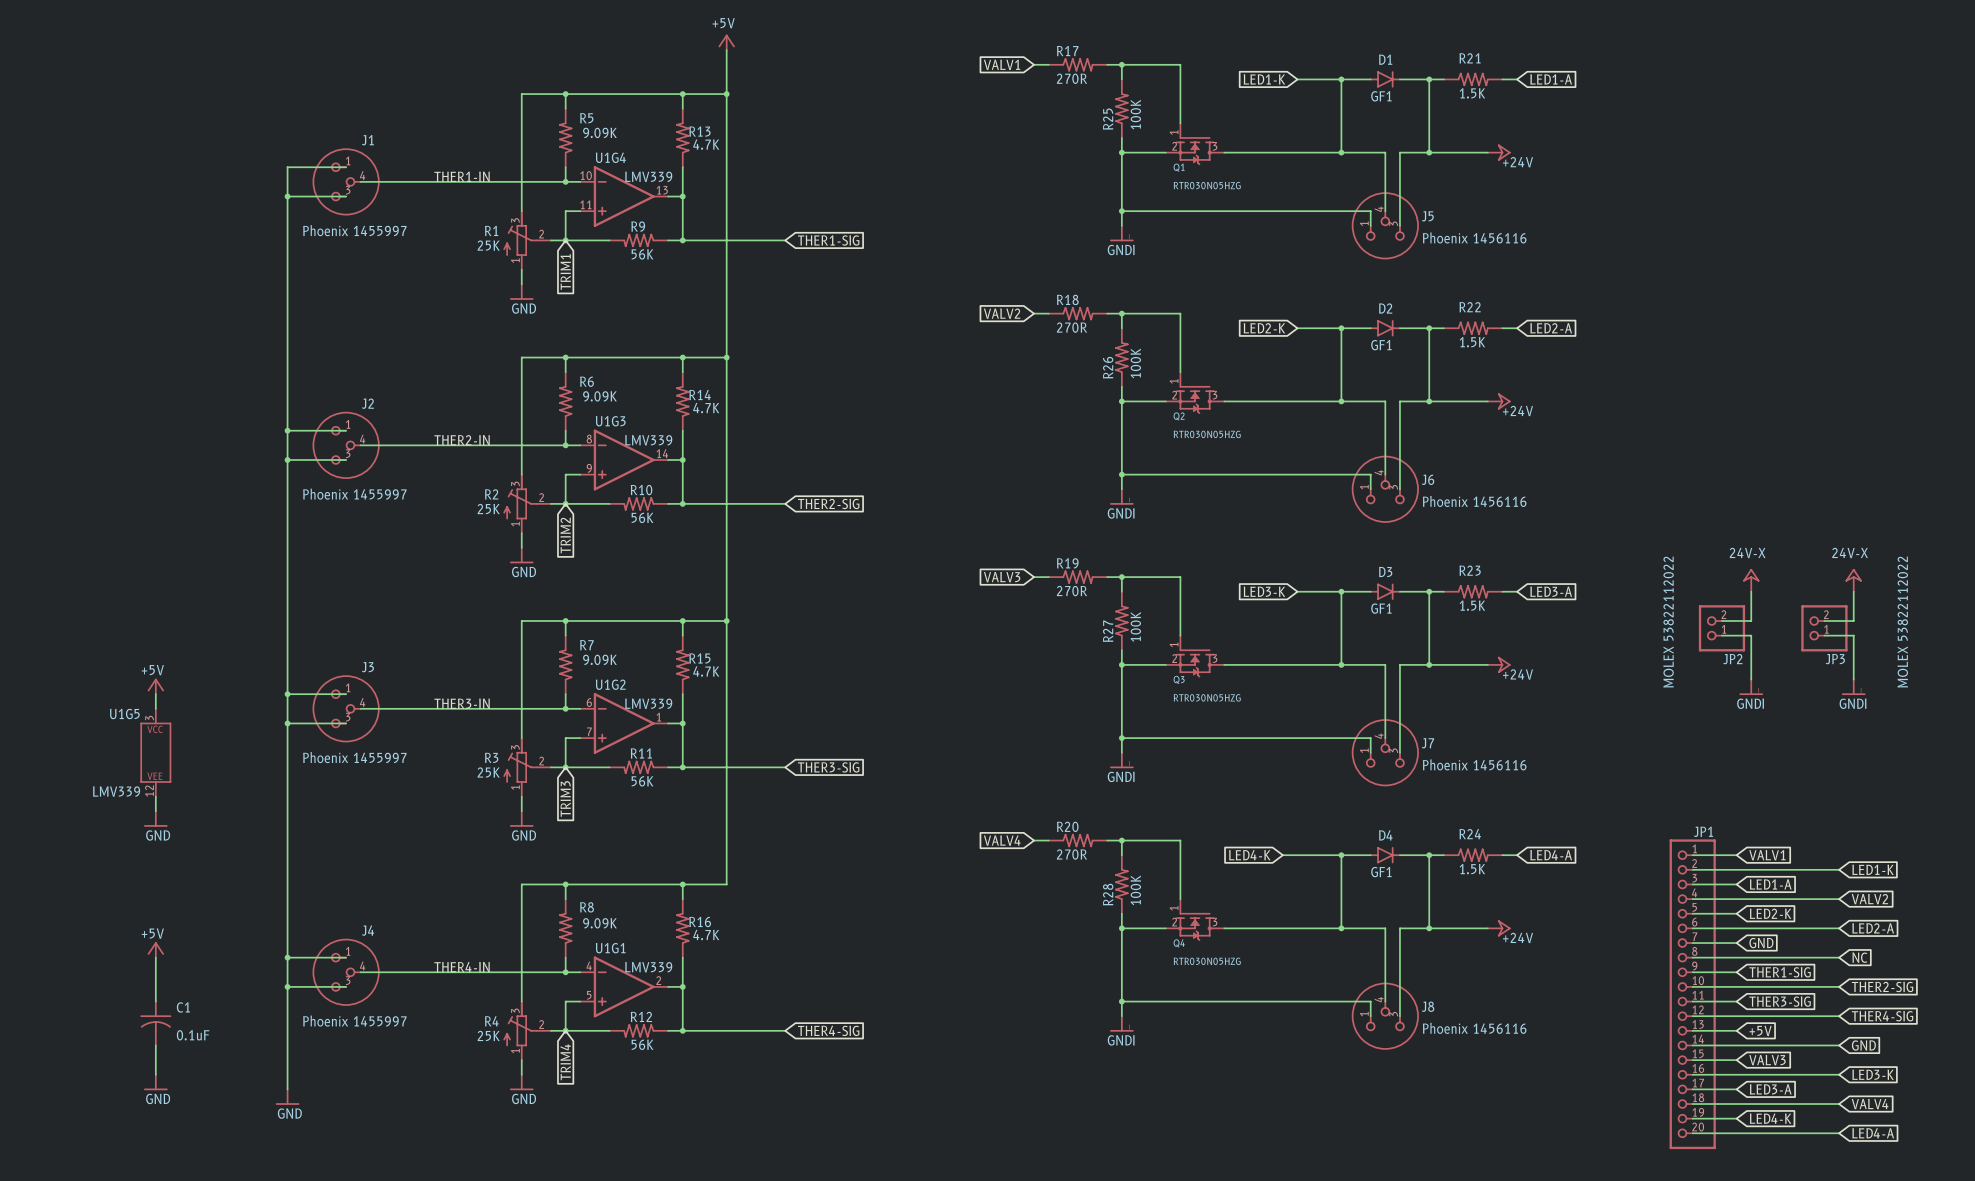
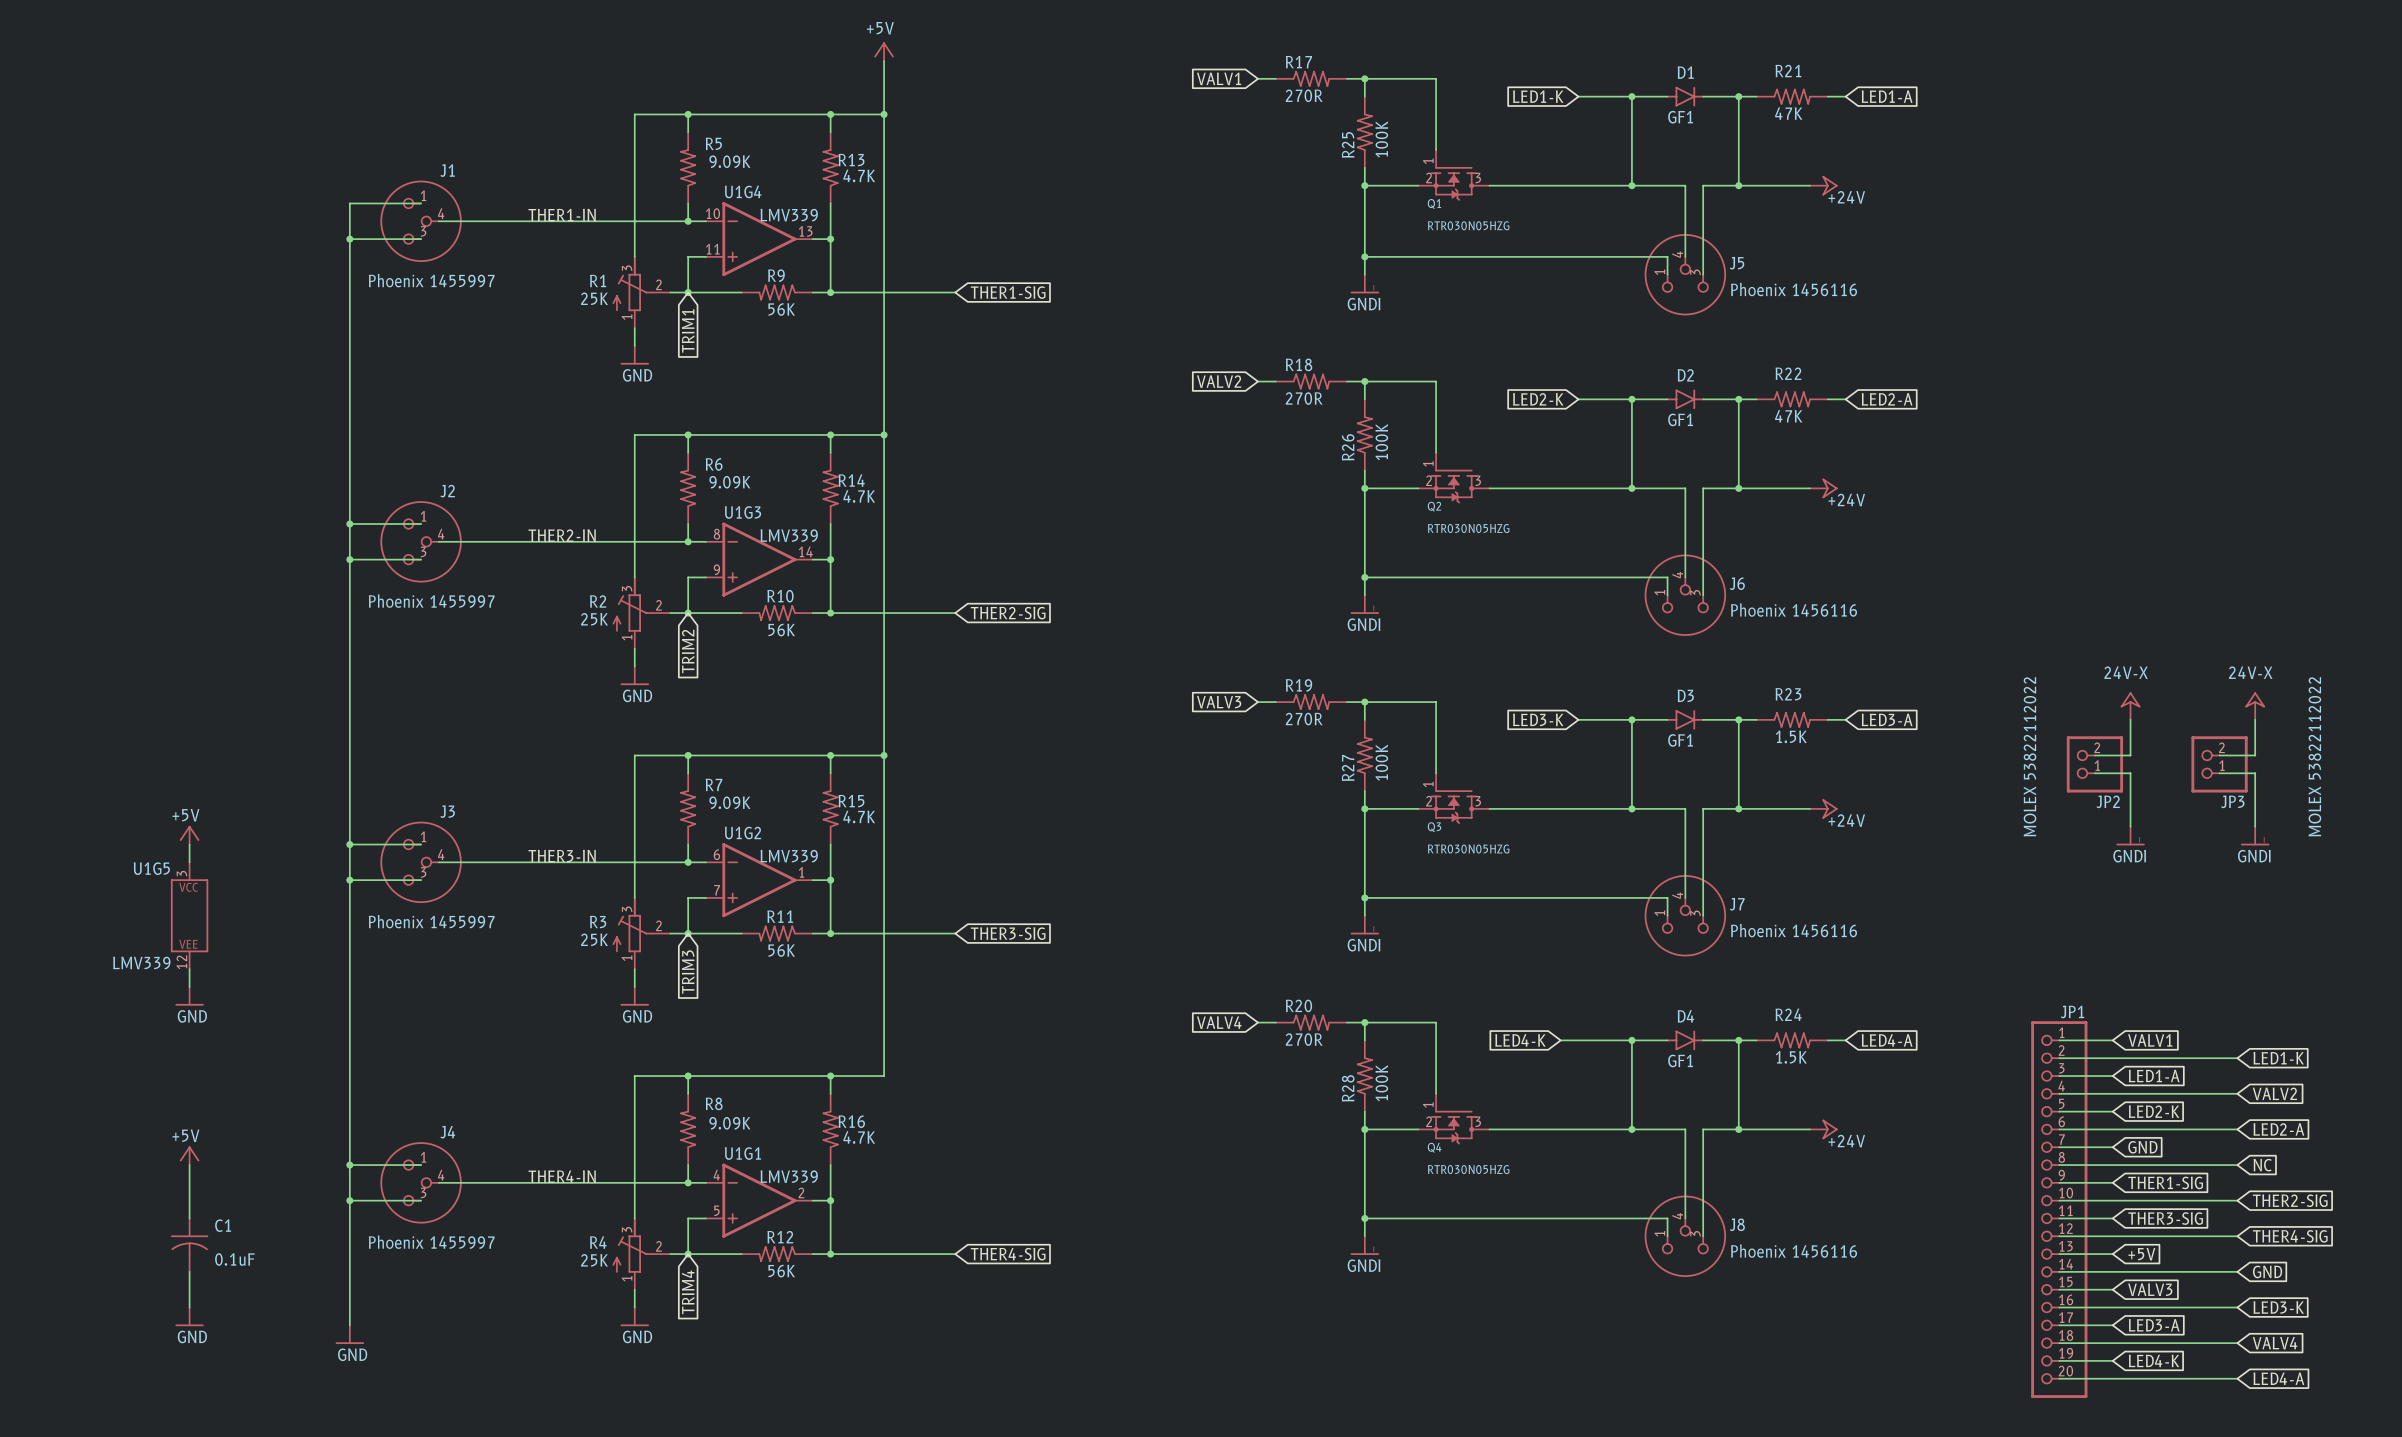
R21 value: 1.5K (1472, 93) -> 47K (1788, 113)
R22 value: 1.5K (1472, 342) -> 47K (1788, 416)

